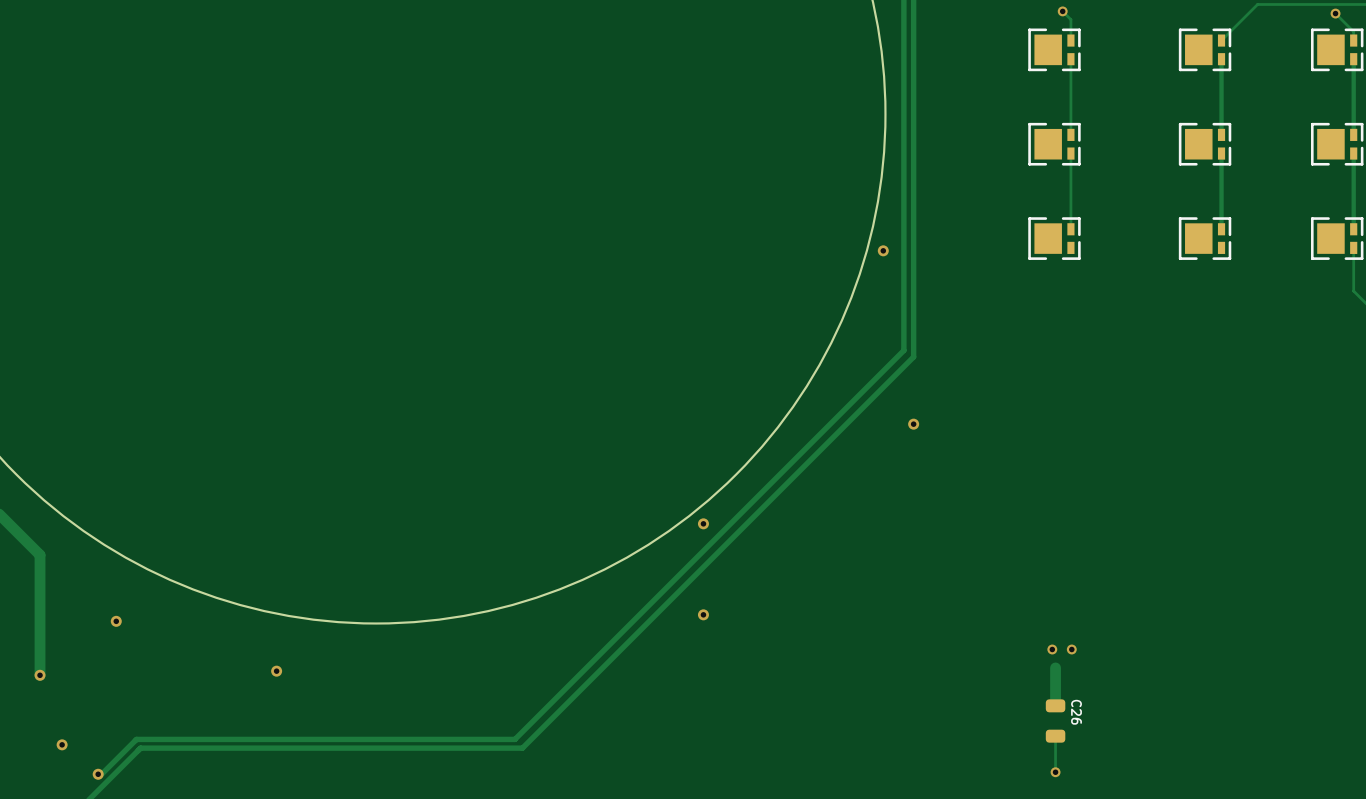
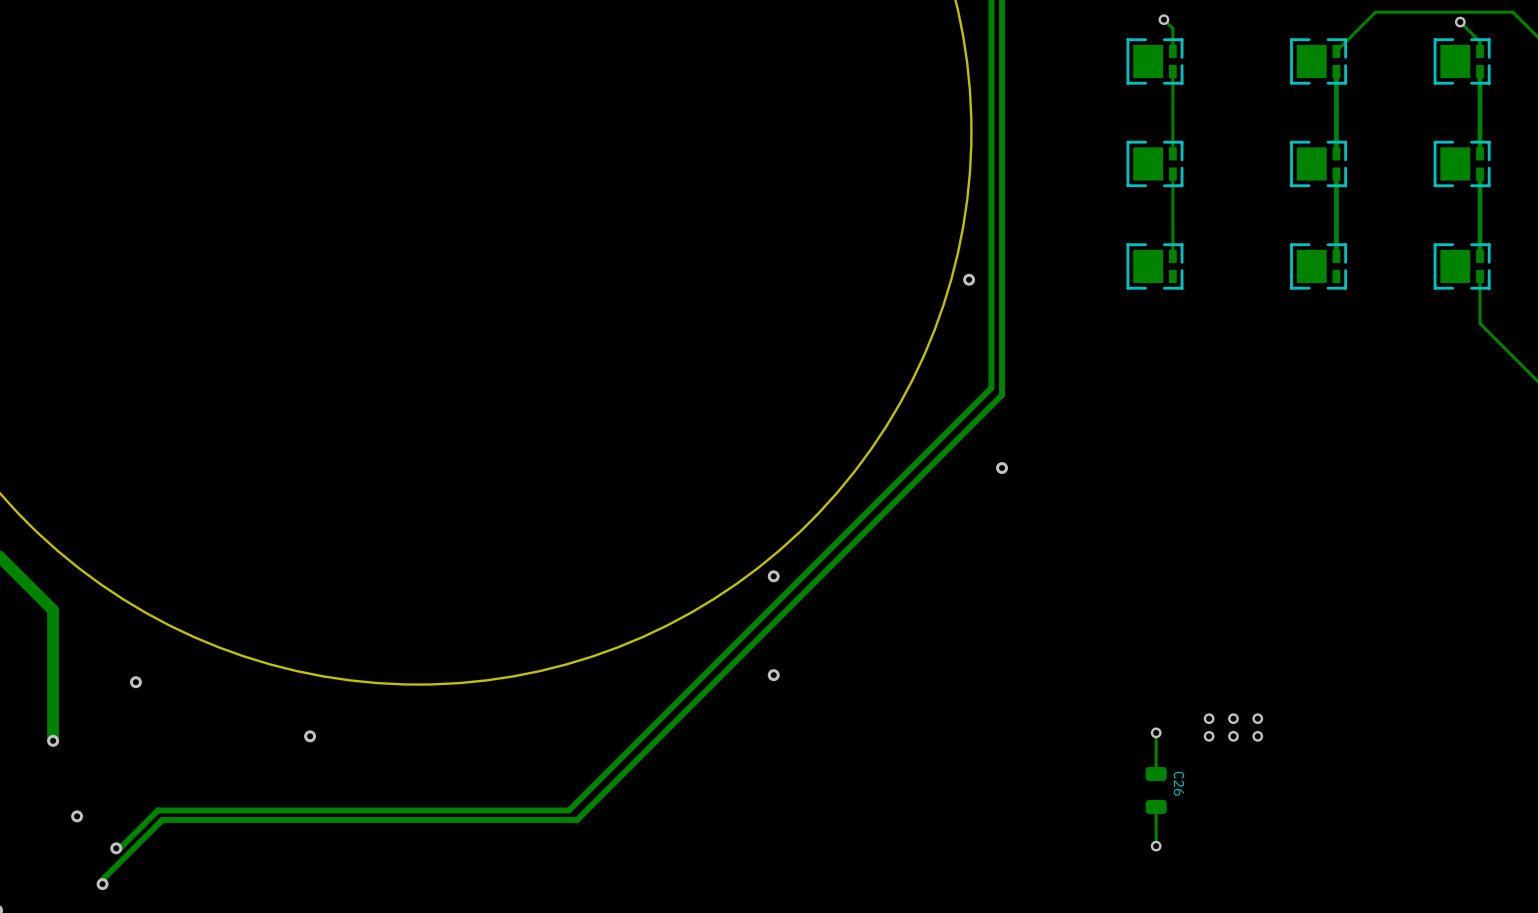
via: (1052, 649) -> none
via: (1071, 649) -> none
via: none -> (1209, 718)
via: none -> (1233, 718)
via: none -> (1257, 718)
track width: thick (1055, 667) (1055, 705) -> thin (1156, 732) (1156, 773)
via: none -> (1156, 732)
via: none -> (1209, 736)
via: none -> (1233, 736)
via: none -> (1257, 736)

